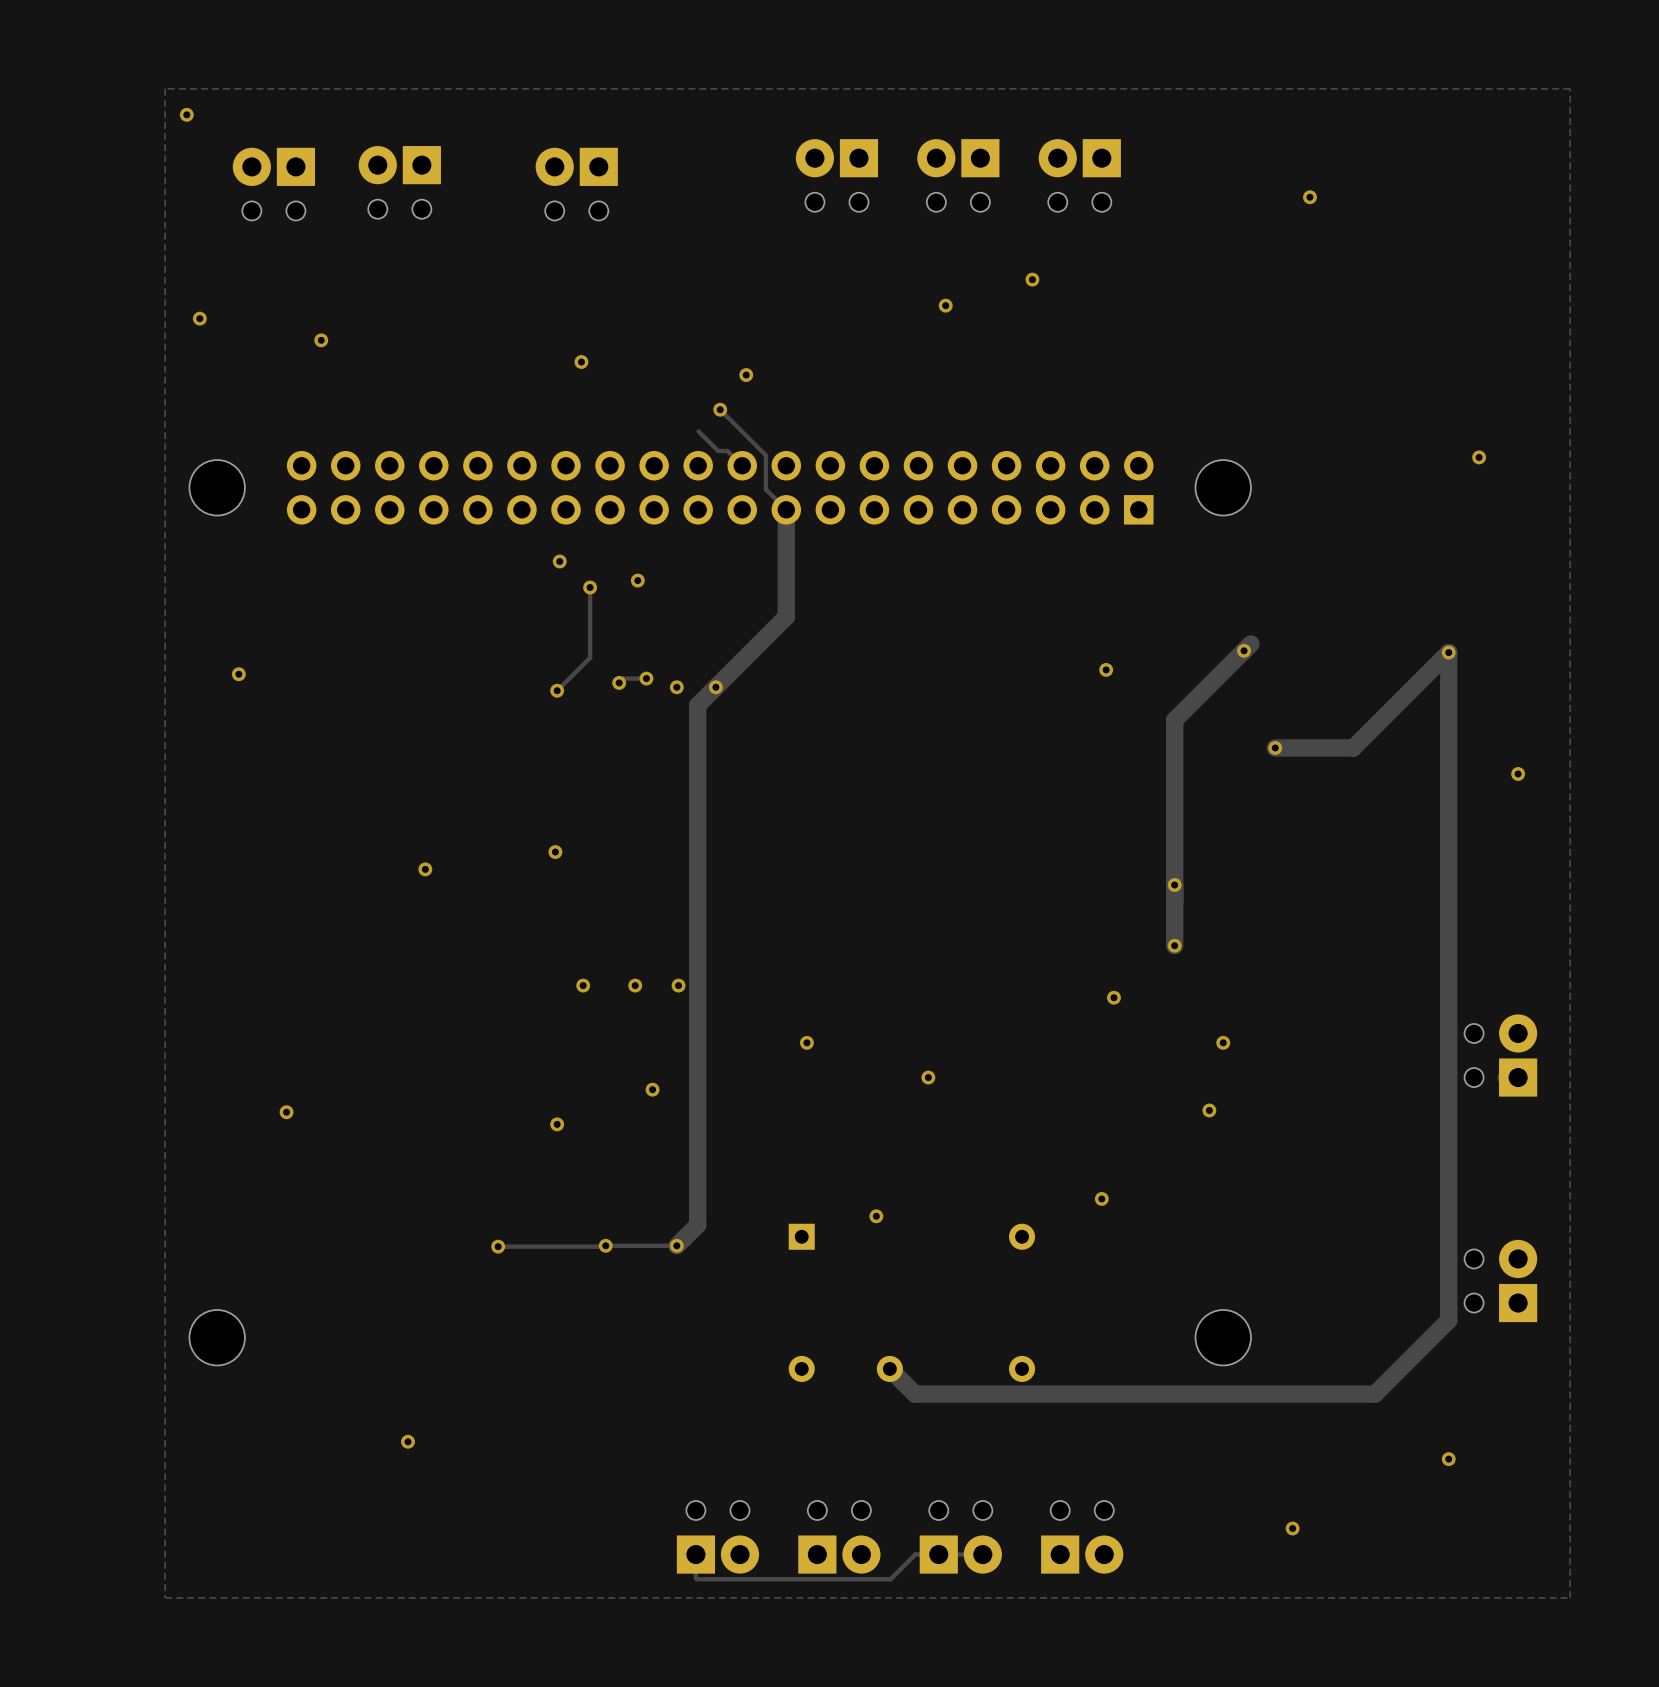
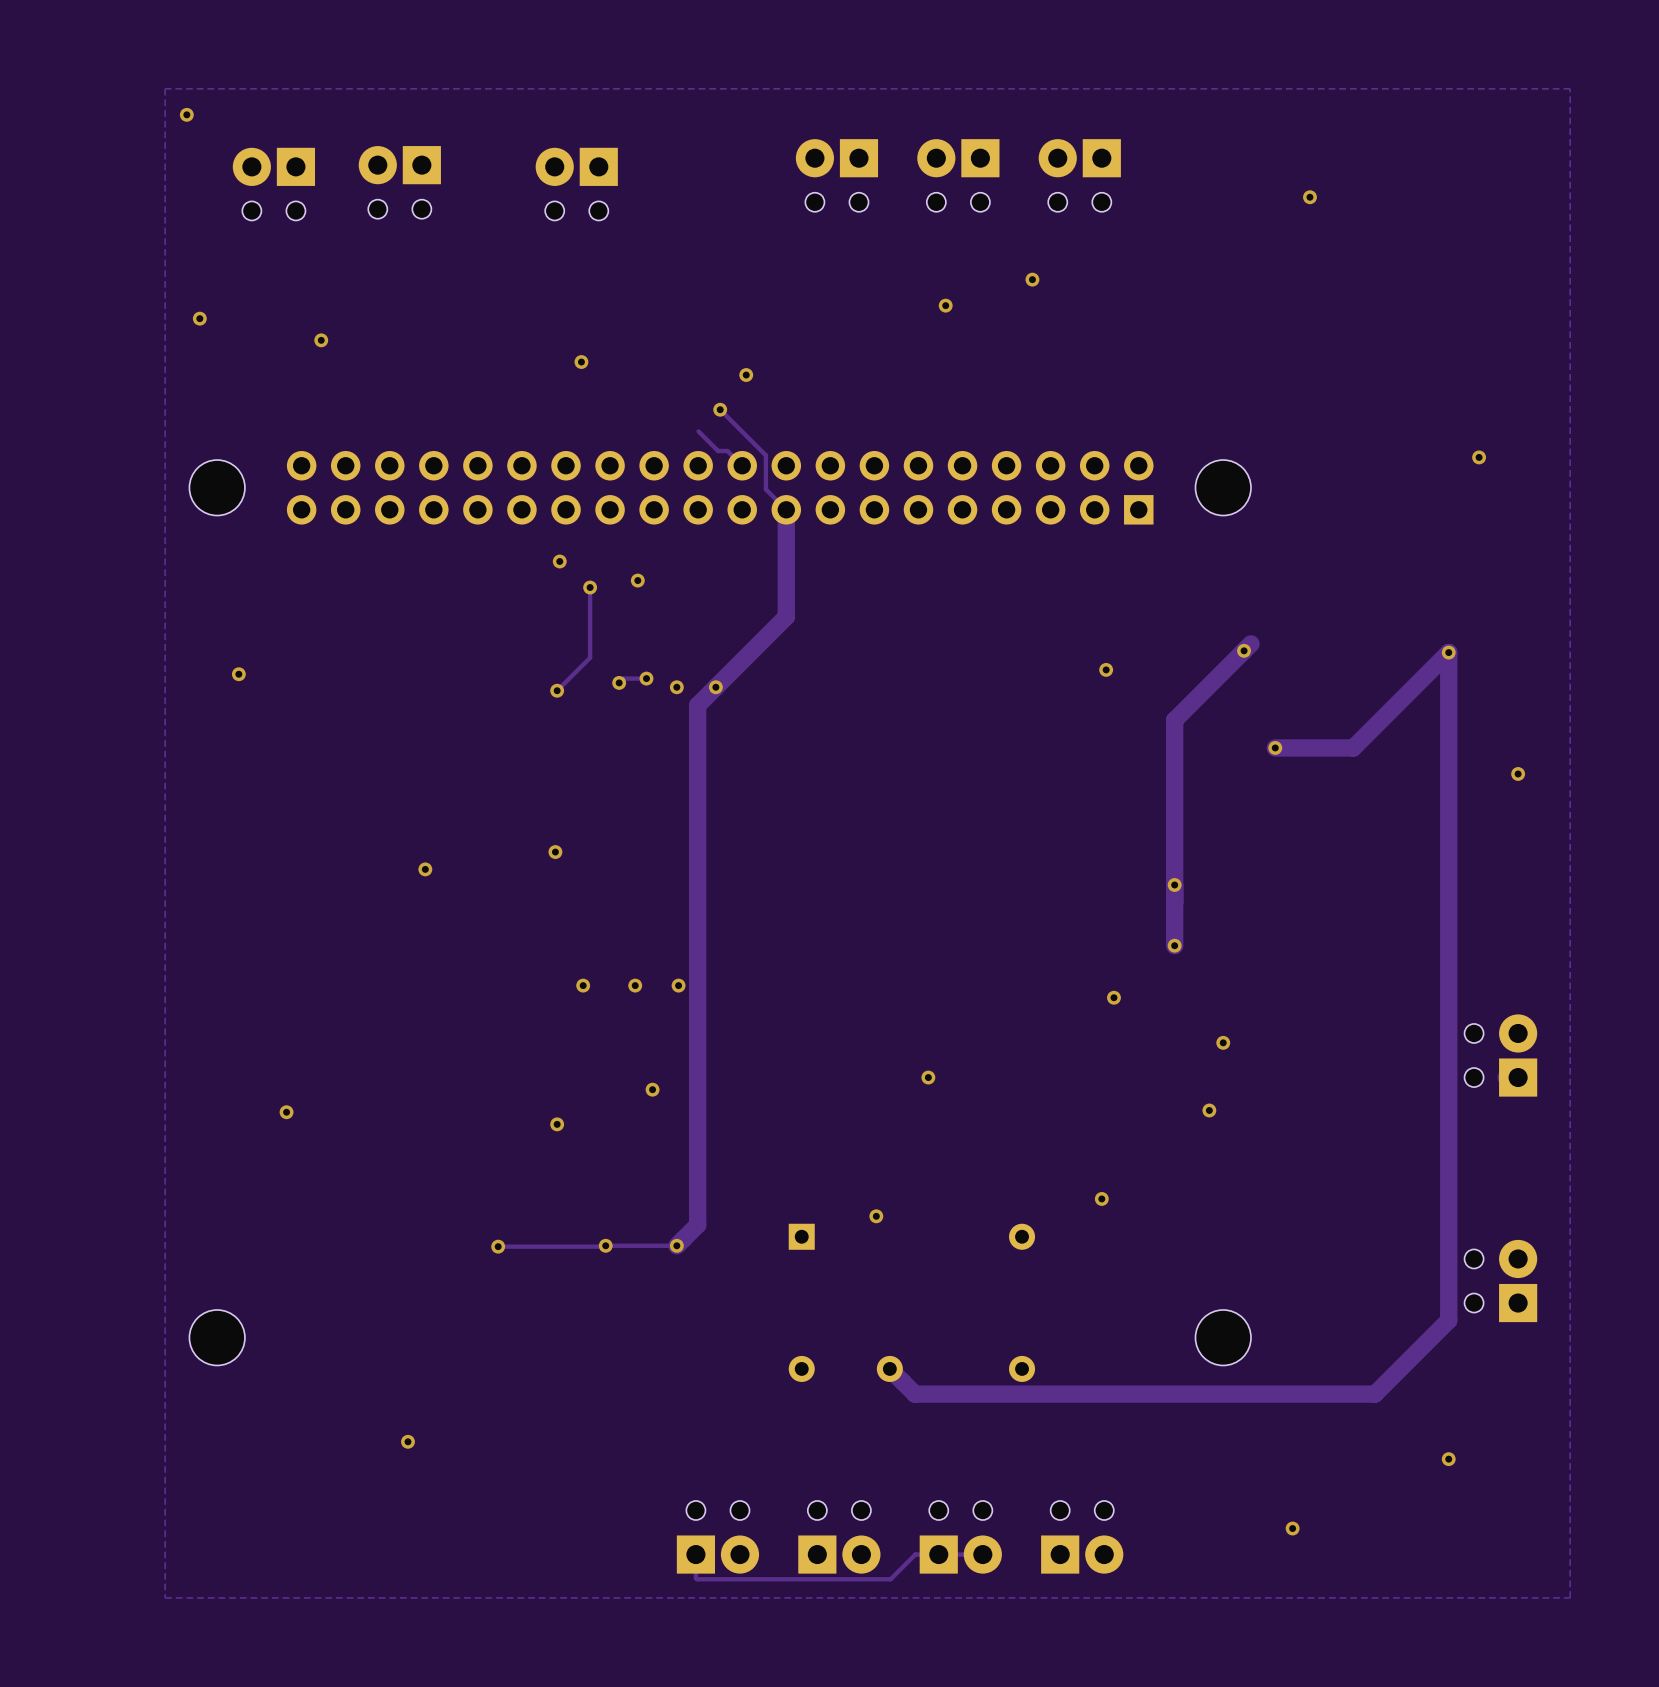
via: (806, 1042) -> none

